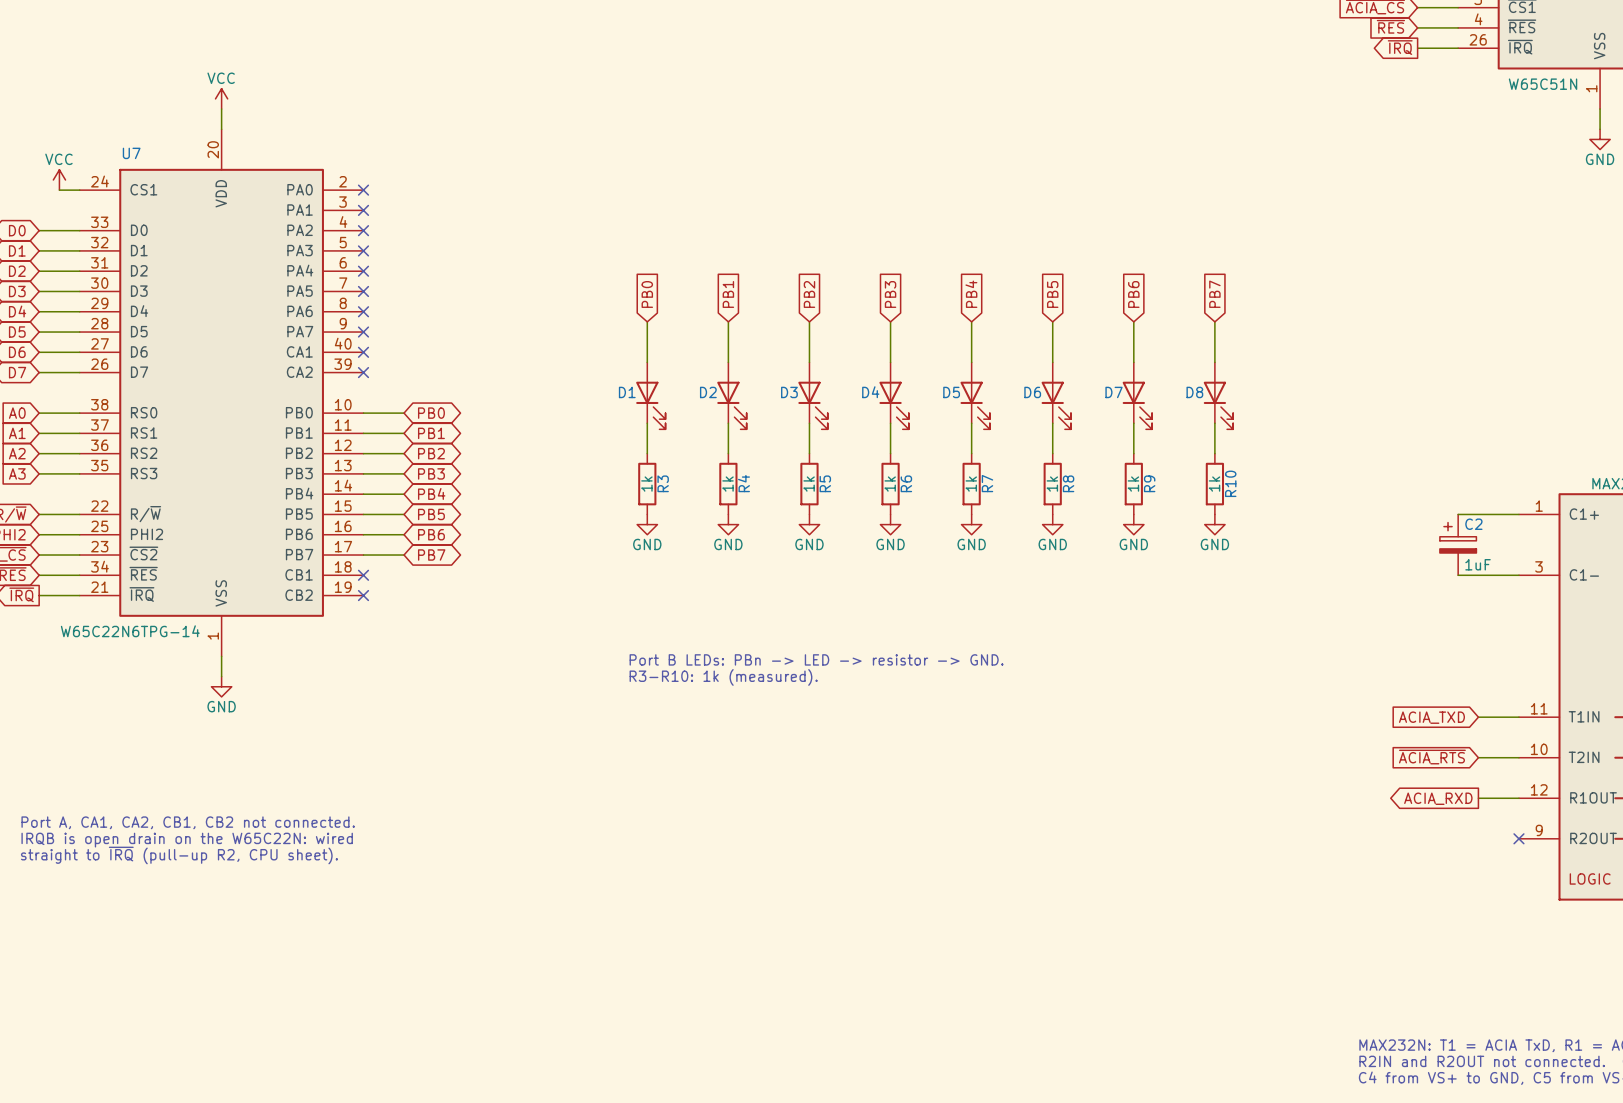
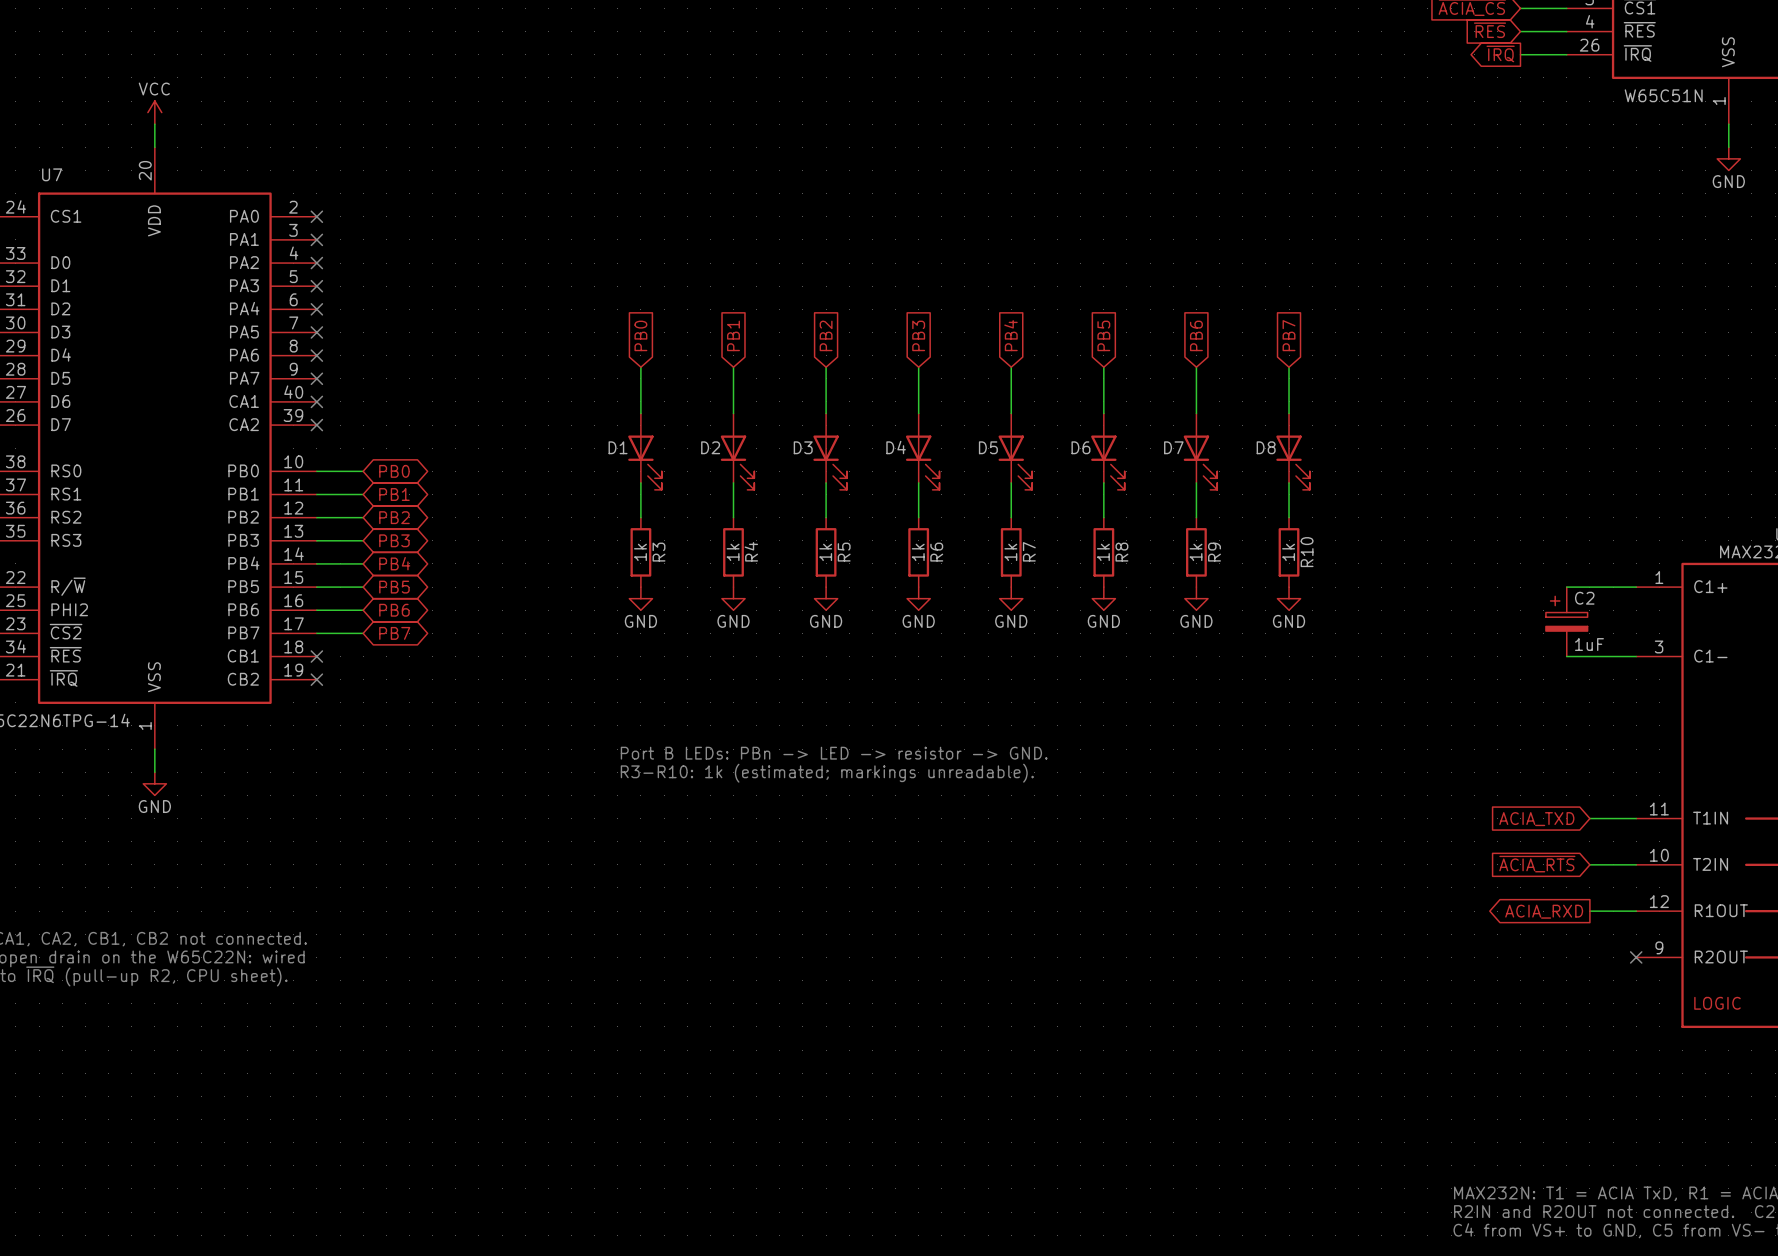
text: R3-R10: 1k (measured). (723, 677) -> R3-R10: 1k (estimated; markings unreadable). (827, 773)

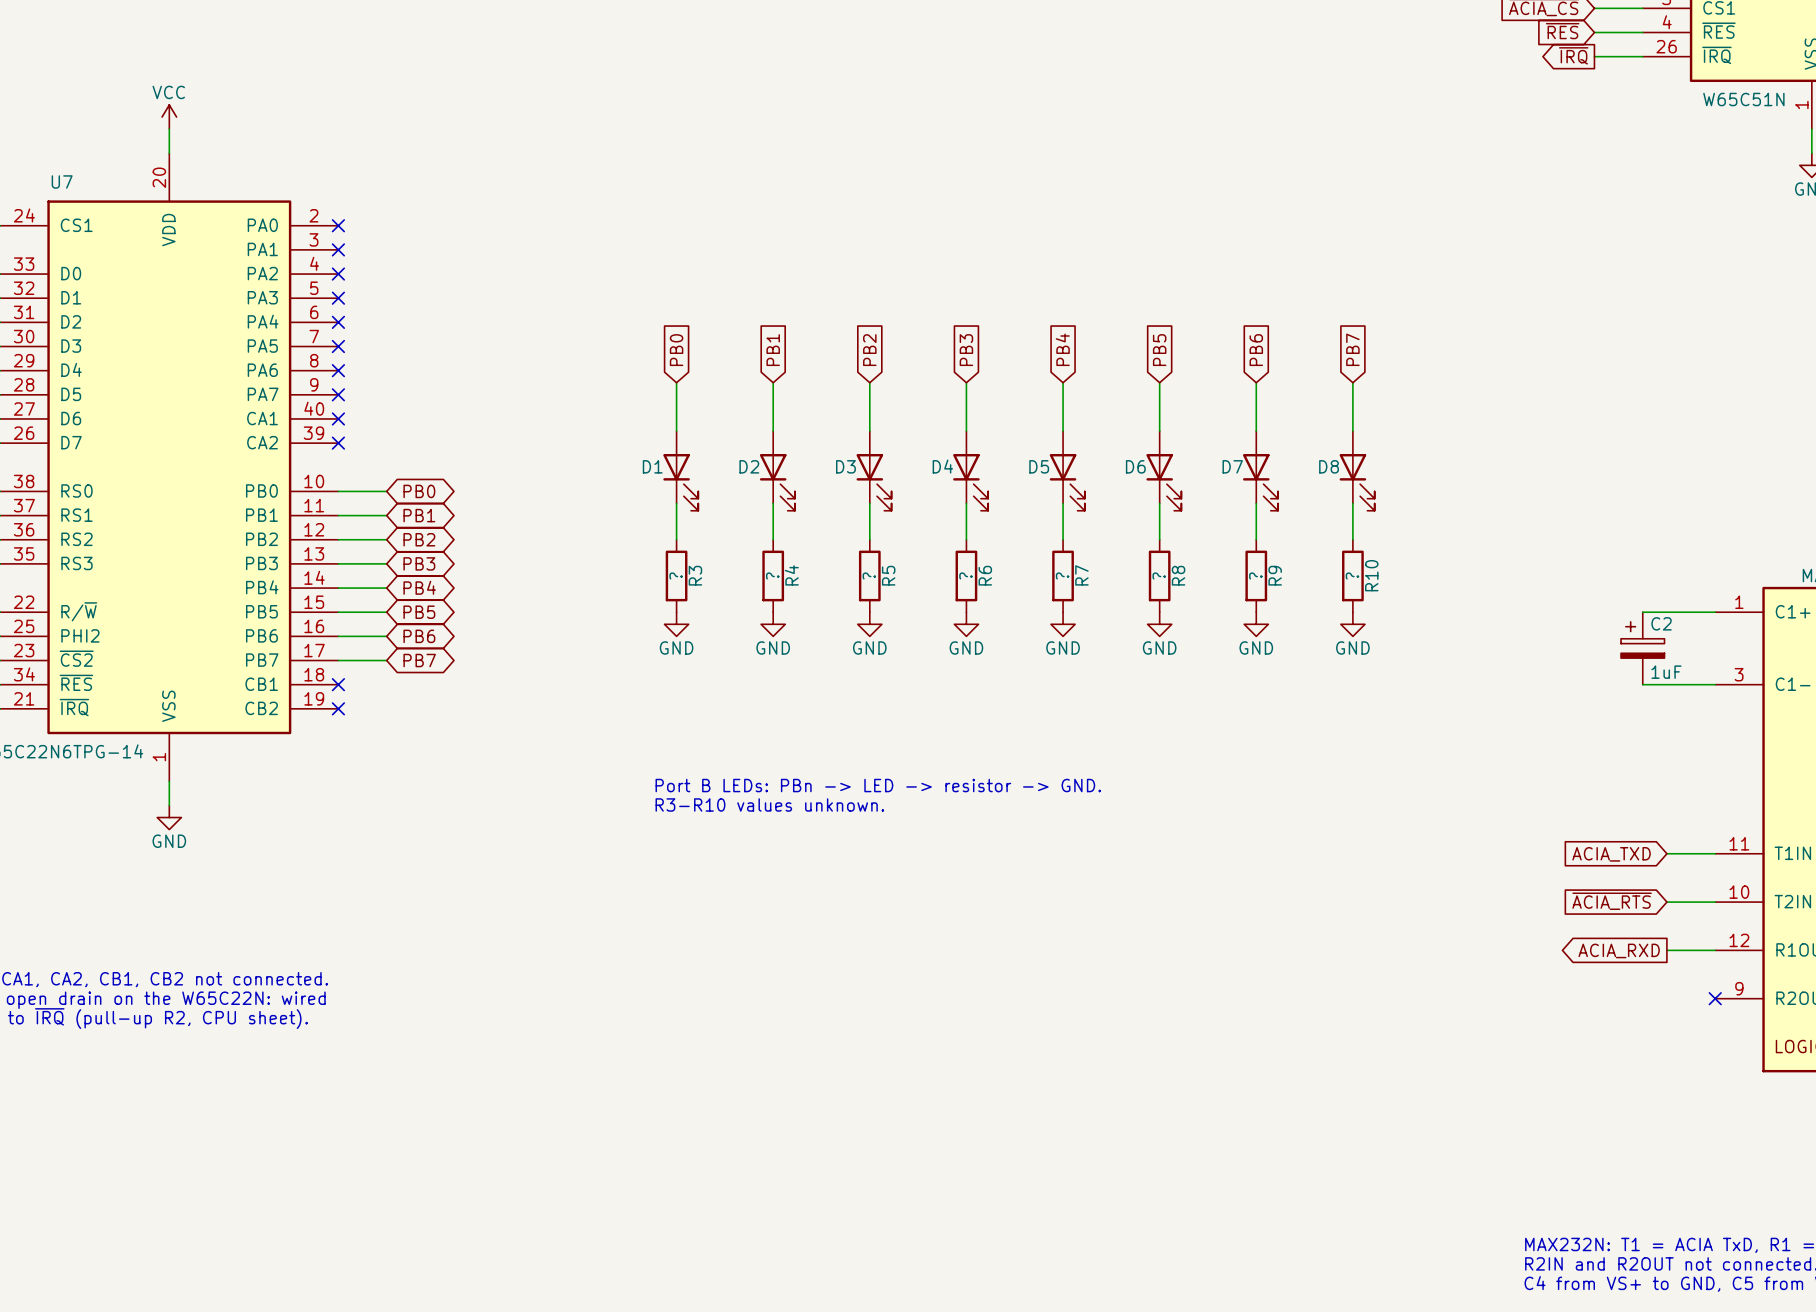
R3 value: 1k (640, 552) -> ? (676, 575)
R4 value: 1k (733, 552) -> ? (772, 575)
R5 value: 1k (825, 552) -> ? (869, 575)
R6 value: 1k (918, 552) -> ? (965, 575)
R7 value: 1k (1010, 552) -> ? (1062, 575)
R8 value: 1k (1103, 552) -> ? (1159, 575)
R9 value: 1k (1195, 552) -> ? (1255, 575)
R10 value: 1k (1288, 552) -> ? (1352, 575)
text: R3-R10: 1k (estimated; markings unreadable). (827, 773) -> R3-R10 values unknown. (769, 804)

